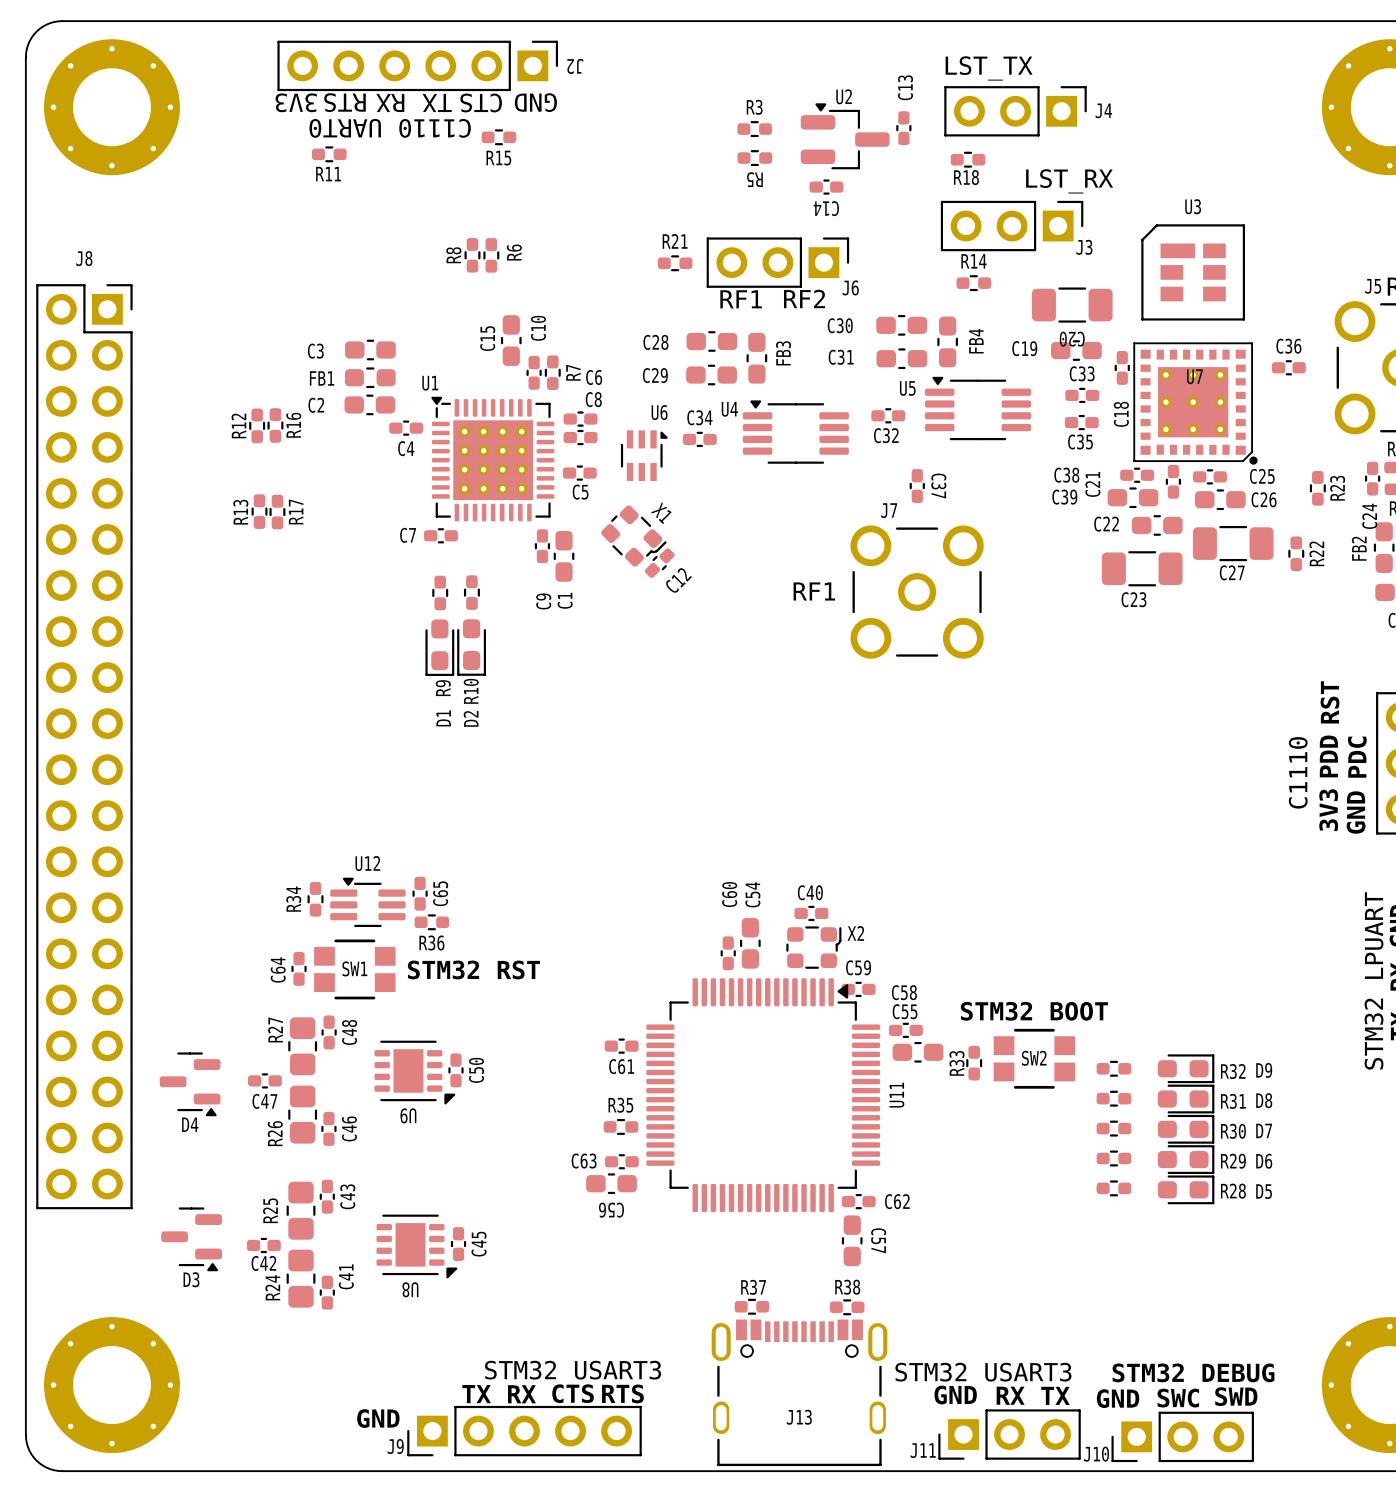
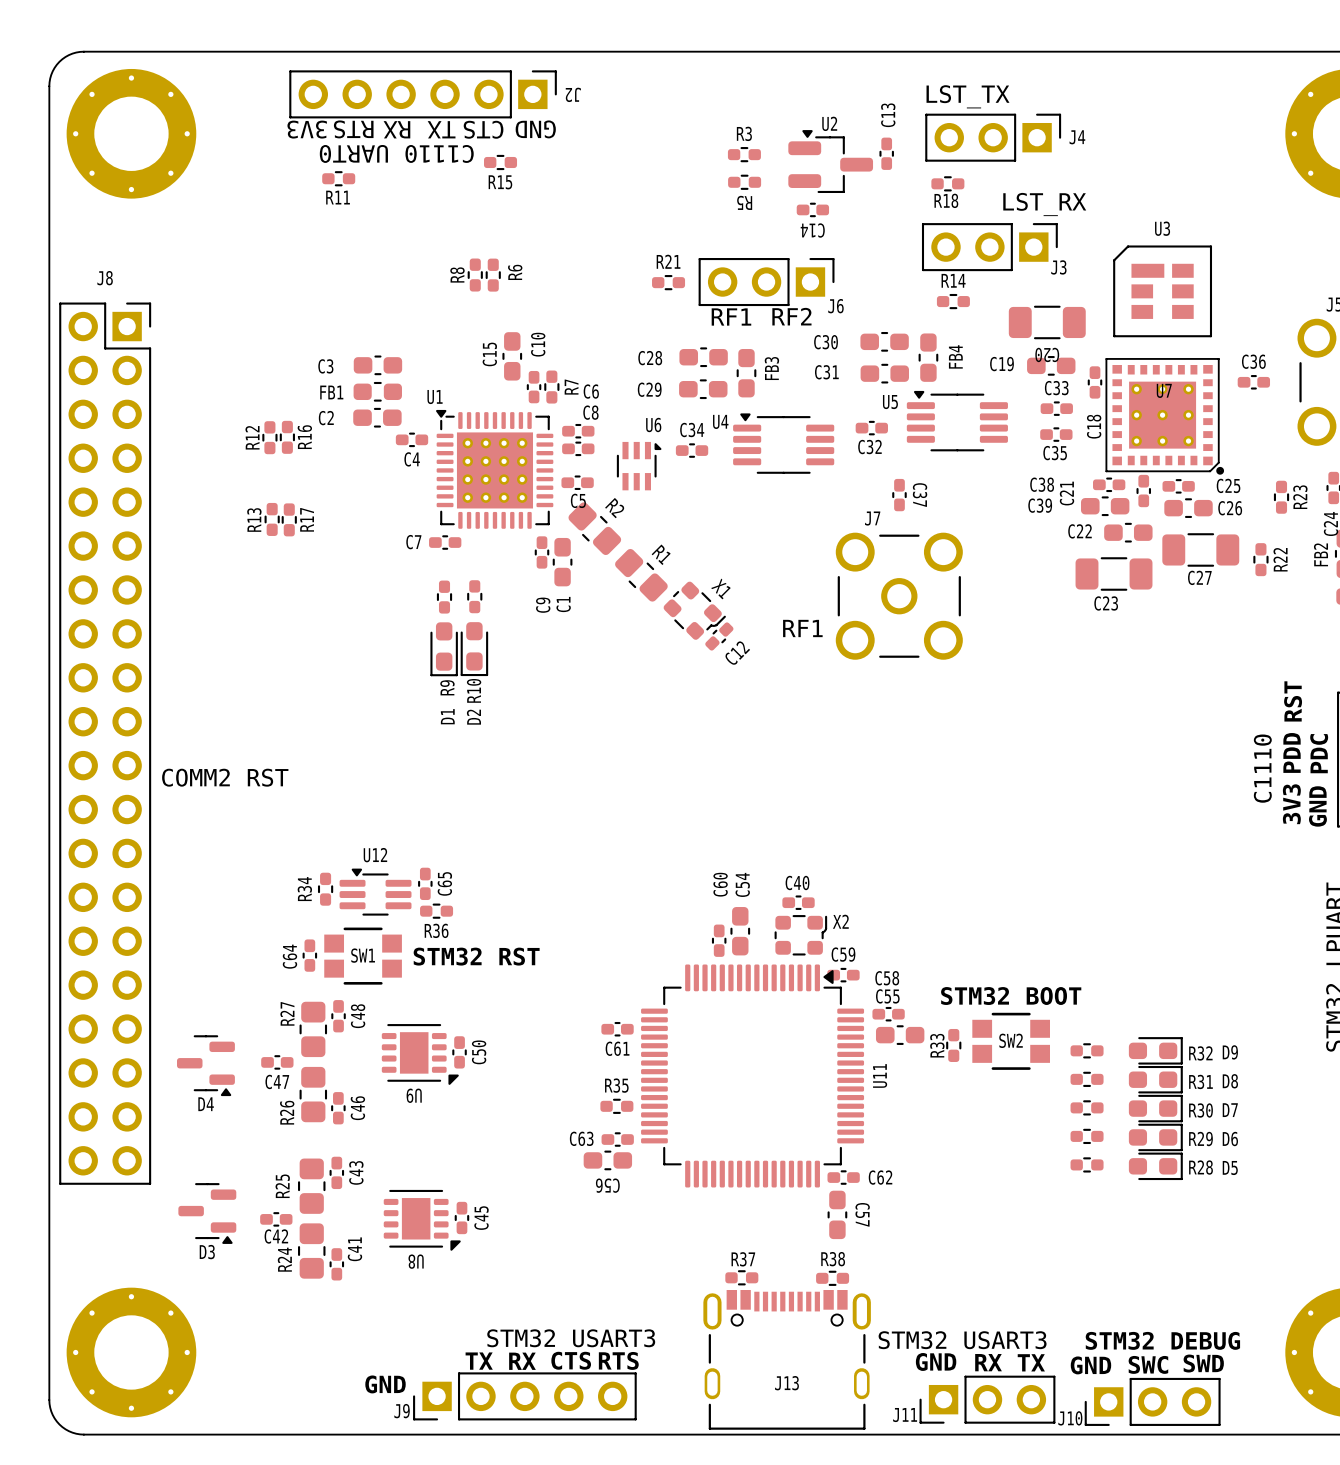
R2: none -> (594, 528)
X1 position: (633, 536) -> (694, 610)
C12 position: (659, 563) -> (719, 636)
R1: none -> (641, 575)
text position: RF1 (814, 591) -> RF1 (802, 628)
text: none -> COMM2 RST (225, 777)

